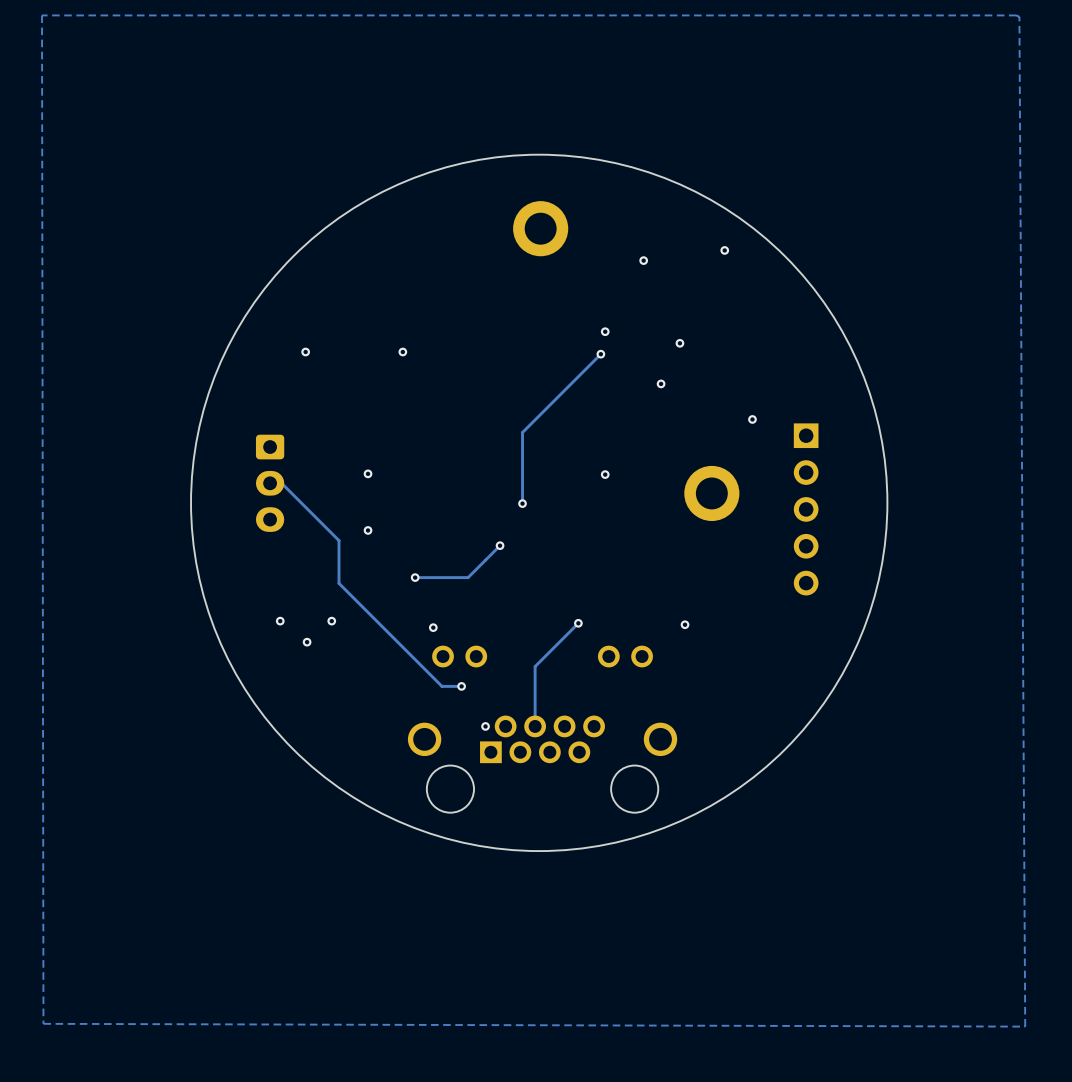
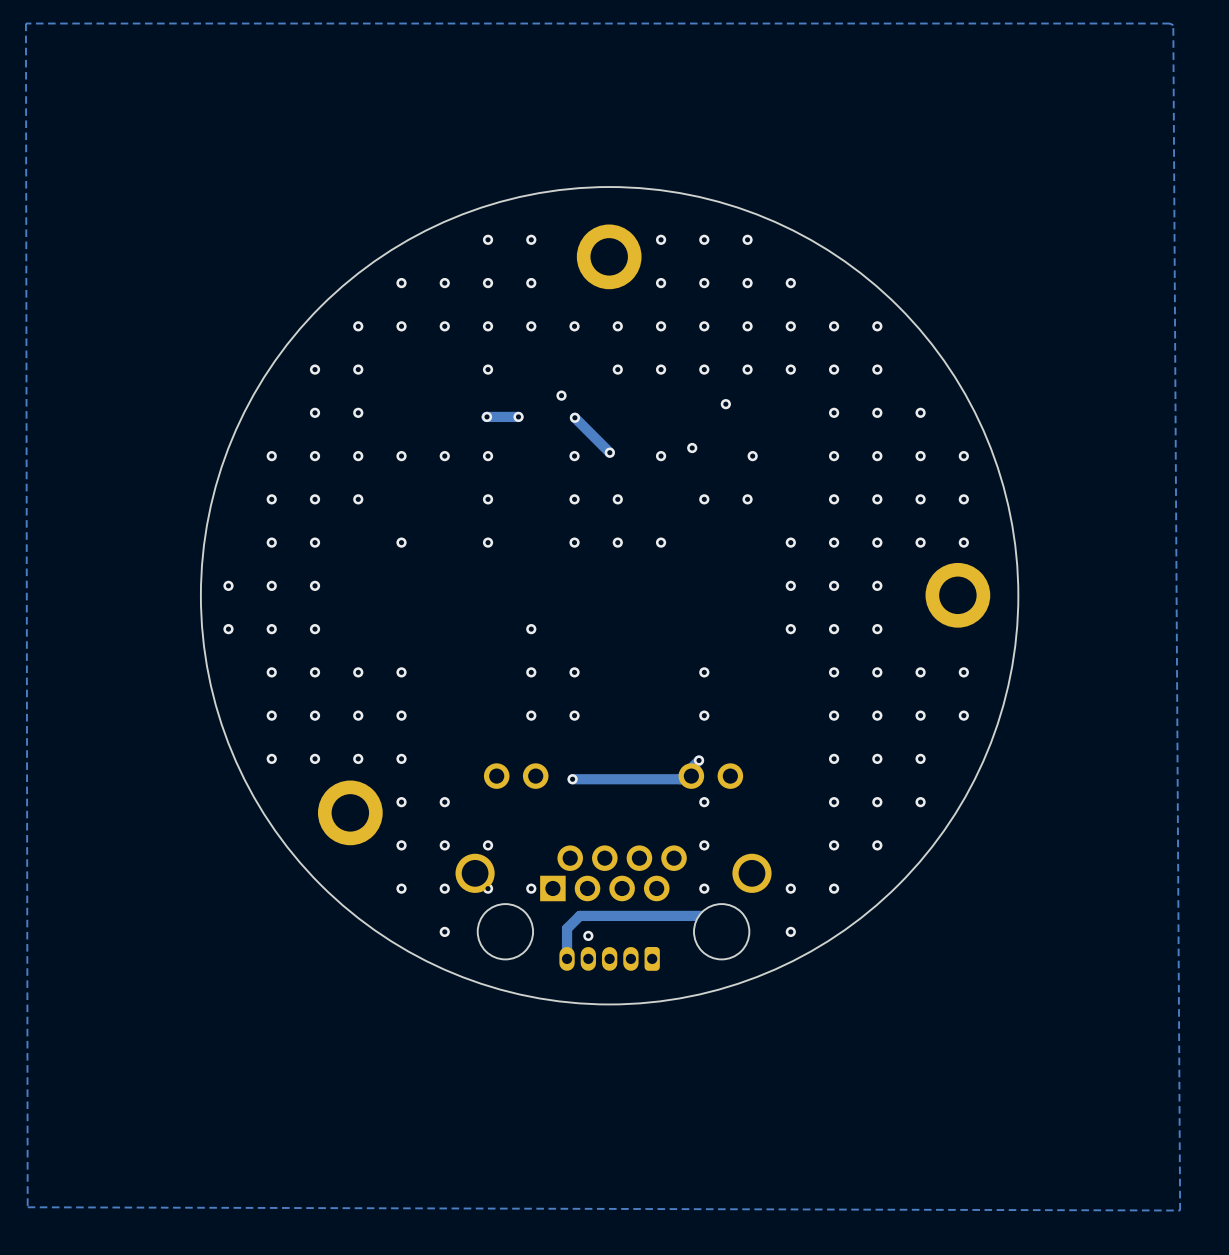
via: none -> (488, 239)
via: none -> (531, 239)
via: none -> (661, 239)
via: none -> (704, 239)
via: none -> (747, 239)
part position: (540, 228) -> (609, 256)
via: none -> (401, 283)
via: none -> (444, 283)
via: none -> (488, 283)
via: none -> (531, 283)
via: none -> (661, 283)
via: none -> (704, 283)
via: none -> (747, 283)
via: none -> (790, 283)
via: (724, 250) -> none
via: (643, 260) -> none
via: none -> (358, 326)
via: none -> (401, 326)
via: none -> (444, 326)
via: none -> (488, 326)
via: none -> (531, 326)
via: none -> (574, 326)
via: none -> (617, 326)
via: none -> (661, 326)
via: none -> (704, 326)
via: none -> (747, 326)
via: none -> (790, 326)
via: none -> (834, 326)
via: none -> (877, 326)
via: none -> (315, 369)
via: none -> (358, 369)
via: none -> (488, 369)
via: none -> (617, 369)
via: none -> (661, 369)
via: none -> (704, 369)
via: none -> (747, 369)
via: none -> (790, 369)
via: none -> (834, 369)
via: none -> (877, 369)
via: (605, 331) -> none
via: none -> (561, 395)
via: none -> (725, 404)
via: (679, 343) -> none
via: none -> (315, 412)
via: none -> (358, 412)
via: none -> (834, 412)
via: none -> (877, 412)
via: none -> (920, 412)
via: none -> (487, 416)
track: none -> (518, 416) (486, 416)
via: none -> (518, 416)
track: none -> (574, 417) (609, 452)
via: none -> (574, 417)
via: (305, 352) -> none
via: (402, 352) -> none
track: (600, 354) (522, 432) (522, 503) -> none
via: (600, 354) -> none
via: none -> (692, 448)
via: none -> (609, 452)
via: none -> (271, 456)
via: none -> (315, 456)
via: none -> (358, 456)
via: none -> (401, 456)
via: none -> (444, 456)
via: none -> (488, 456)
via: none -> (574, 456)
via: none -> (661, 456)
via: none -> (834, 456)
via: none -> (877, 456)
via: none -> (920, 456)
via: none -> (963, 456)
via: (752, 419) -> none
via: none -> (271, 499)
via: none -> (315, 499)
via: none -> (358, 499)
via: none -> (488, 499)
via: none -> (574, 499)
via: none -> (617, 499)
via: none -> (704, 499)
via: none -> (747, 499)
via: none -> (834, 499)
via: none -> (877, 499)
via: none -> (920, 499)
via: none -> (963, 499)
via: none -> (271, 542)
via: none -> (315, 542)
via: none -> (488, 542)
via: none -> (574, 542)
via: none -> (617, 542)
via: none -> (661, 542)
via: none -> (790, 542)
via: none -> (834, 542)
via: none -> (877, 542)
via: none -> (920, 542)
via: none -> (963, 542)
via position: (368, 473) -> (401, 542)
via: (605, 474) -> none
track: (270, 483) (281, 483) (339, 540) (339, 583) (442, 686) (461, 686) -> none
part: (270, 483) -> none
part position: (711, 493) -> (957, 595)
via: none -> (228, 585)
via: none -> (271, 585)
via: none -> (315, 585)
via: none -> (790, 585)
via: none -> (834, 585)
via: none -> (877, 585)
via: (522, 503) -> none
part: (806, 509) -> none
via: (368, 530) -> none
via: none -> (228, 629)
via: none -> (271, 629)
via: none -> (315, 629)
via: none -> (531, 629)
via: none -> (790, 629)
via: none -> (834, 629)
via: none -> (877, 629)
track: (500, 545) (468, 577) (415, 577) -> none
via: (500, 545) -> none
via: none -> (271, 672)
via: none -> (315, 672)
via: none -> (358, 672)
via: none -> (401, 672)
via: none -> (531, 672)
via: none -> (574, 672)
via: none -> (704, 672)
via: none -> (834, 672)
via: none -> (877, 672)
via: none -> (920, 672)
via: none -> (963, 672)
via: (415, 577) -> none
via: none -> (271, 715)
via: none -> (315, 715)
via: none -> (358, 715)
via: none -> (401, 715)
via: none -> (531, 715)
via: none -> (574, 715)
via: none -> (704, 715)
via: none -> (834, 715)
via: none -> (877, 715)
via: none -> (920, 715)
via: none -> (963, 715)
via: (280, 621) -> none
via: (331, 621) -> none
track: (578, 623) (535, 666) (535, 726) -> none
via: (578, 623) -> none
via: (685, 624) -> none
via: (433, 627) -> none
via: none -> (271, 758)
via: none -> (315, 758)
via: none -> (358, 758)
via: none -> (401, 758)
via: none -> (834, 758)
via: none -> (877, 758)
via: none -> (920, 758)
via: (307, 642) -> none
track: none -> (699, 760) (680, 779) (572, 779)
via: none -> (699, 760)
via: none -> (572, 779)
via: none -> (401, 802)
via: none -> (444, 802)
via: none -> (704, 802)
via: none -> (834, 802)
via: none -> (877, 802)
via: none -> (920, 802)
via: (461, 686) -> none
part: none -> (350, 812)
via: none -> (401, 845)
via: none -> (444, 845)
via: none -> (488, 845)
via: none -> (704, 845)
via: none -> (834, 845)
via: none -> (877, 845)
via: (485, 726) -> none
via: none -> (401, 888)
via: none -> (444, 888)
via: none -> (488, 888)
via: none -> (531, 888)
via: none -> (704, 888)
via: none -> (790, 888)
via: none -> (834, 888)
track: none -> (720, 915) (579, 915) (567, 928) (567, 958)
via: none -> (444, 931)
via: none -> (790, 931)
via: none -> (588, 935)
part: none -> (609, 958)

